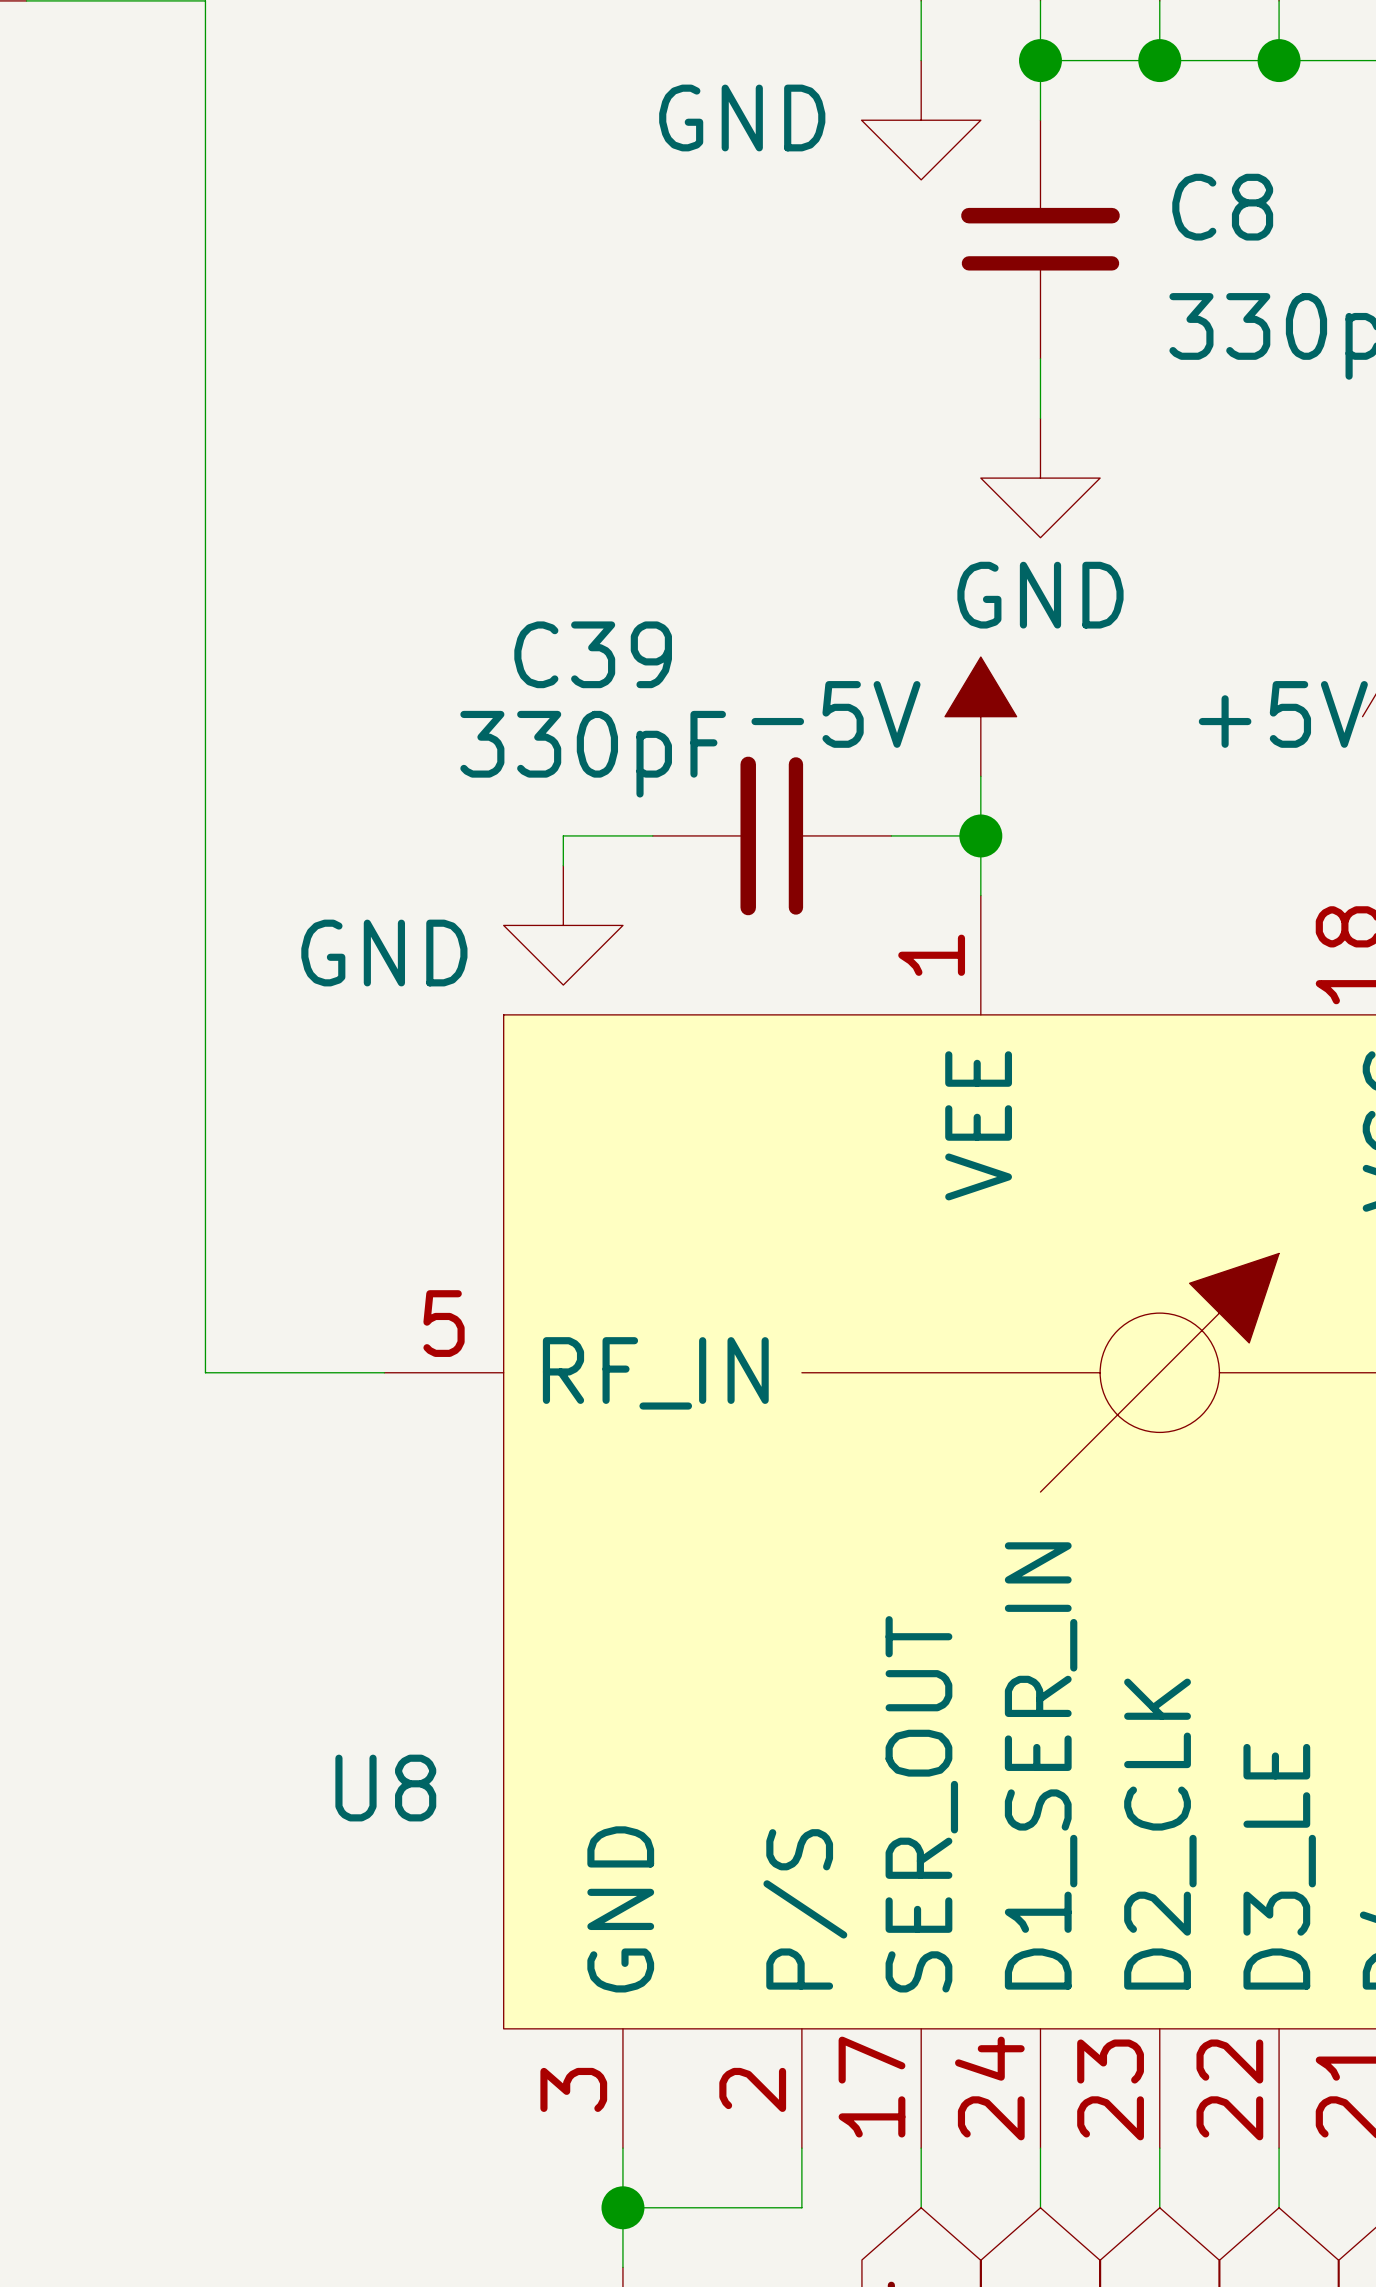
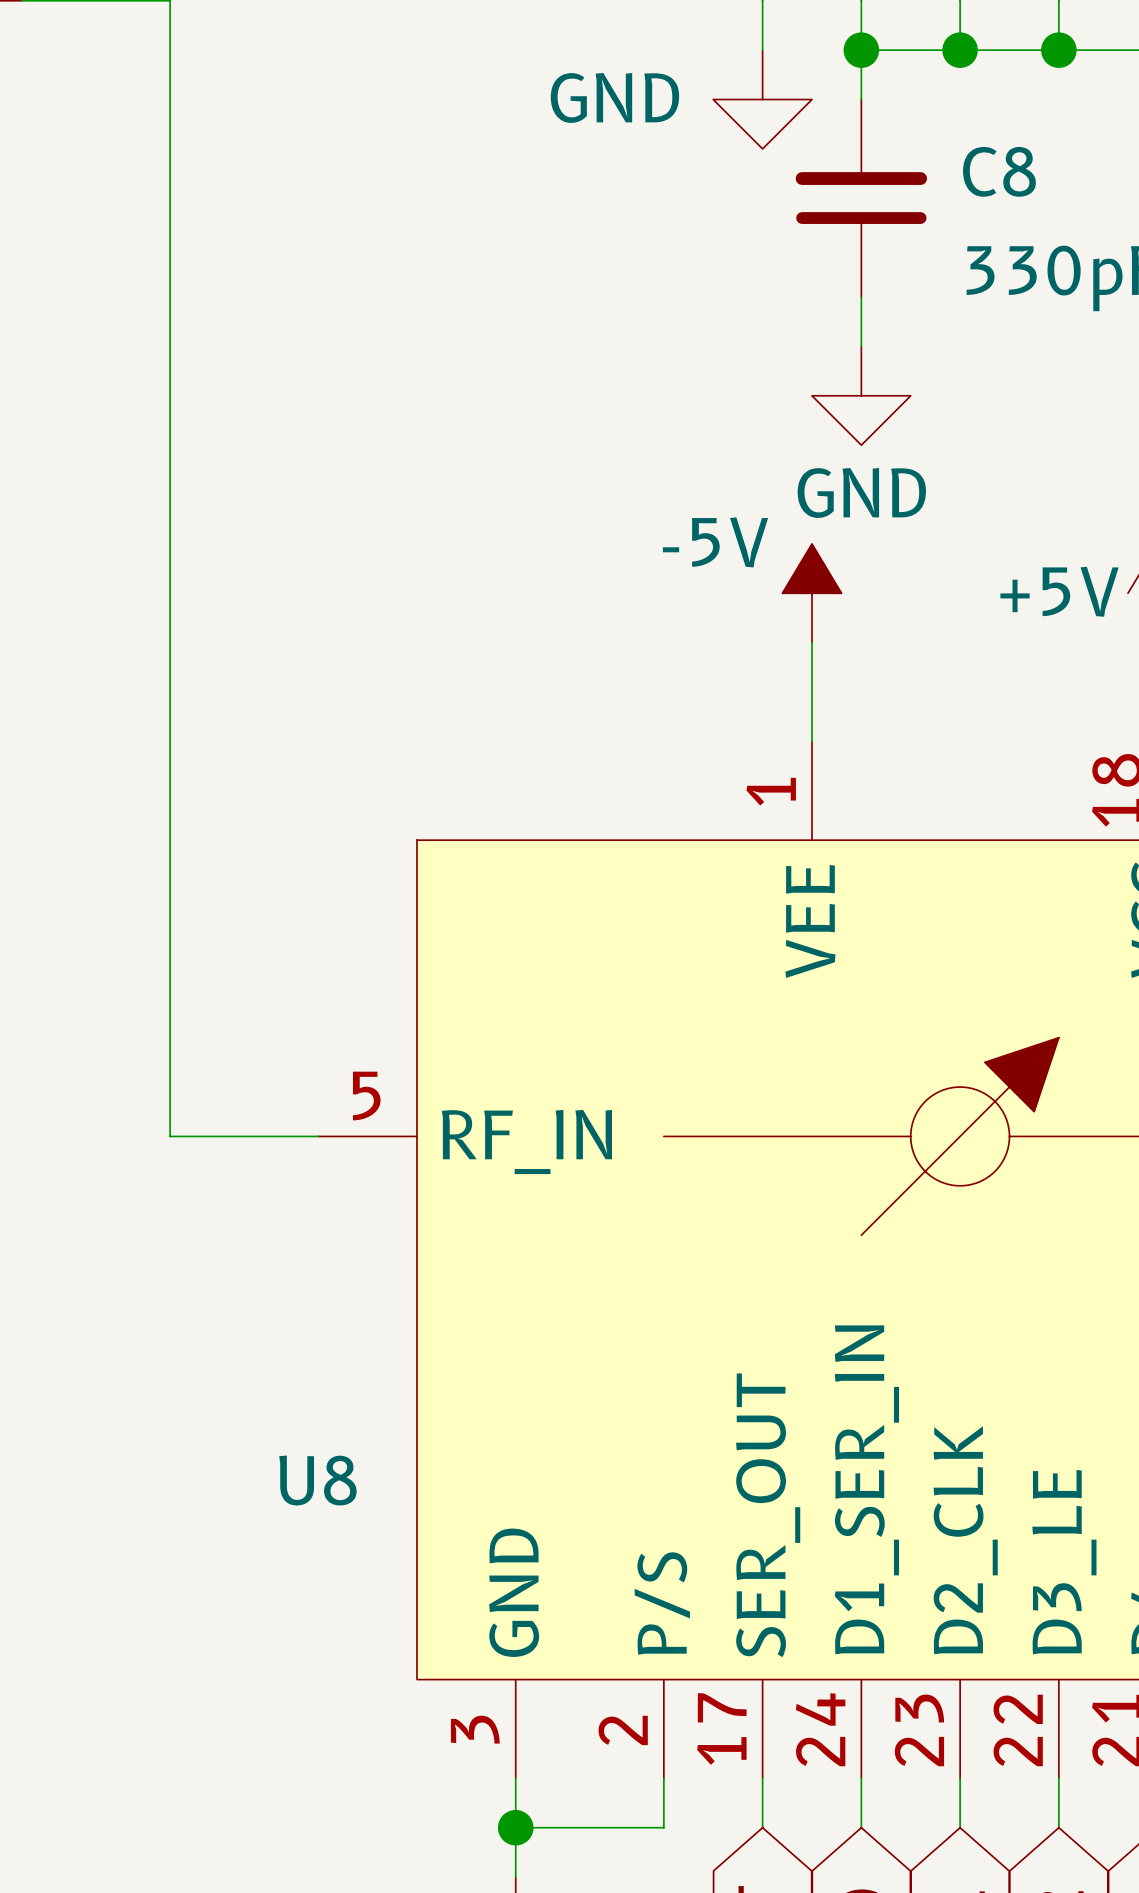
power symbol text position: -5V (835, 714) -> -5V (715, 542)
wire: (652, 835) (563, 835) (563, 865) -> none
C39: 330pF (772, 835) -> none
wire: (891, 835) (980, 835) -> none
junction: (980, 835) -> none
power symbol: GND (563, 925) -> none

